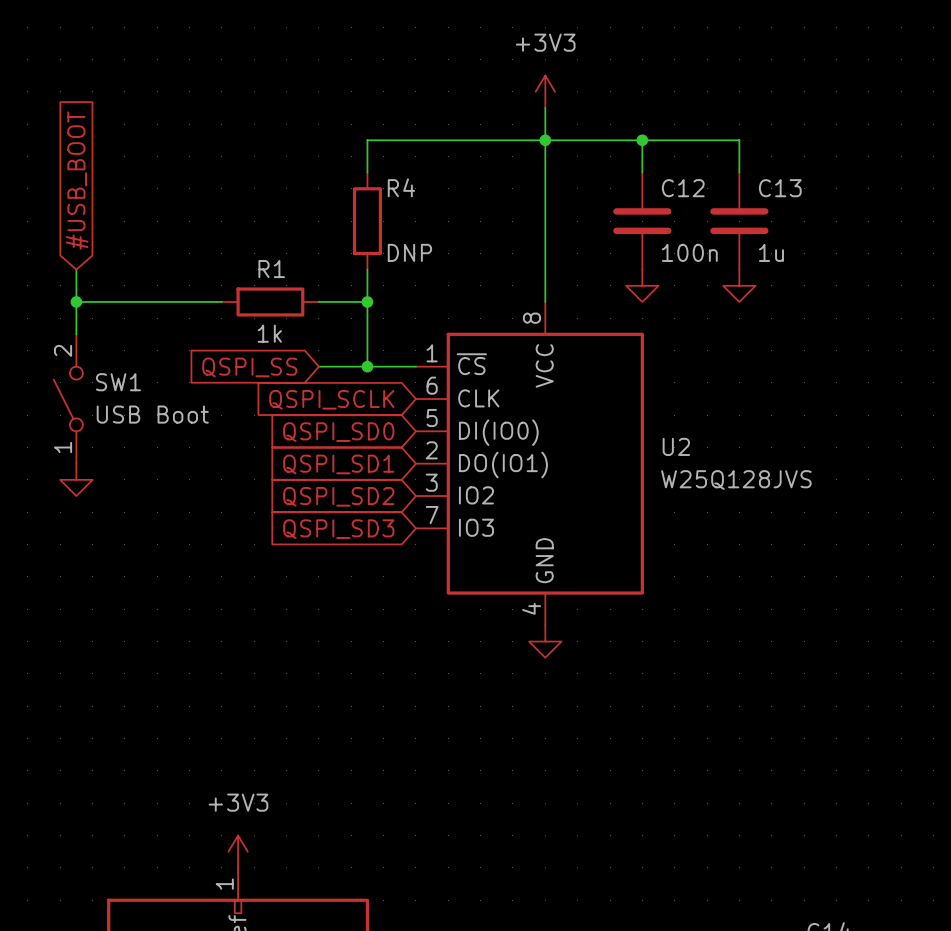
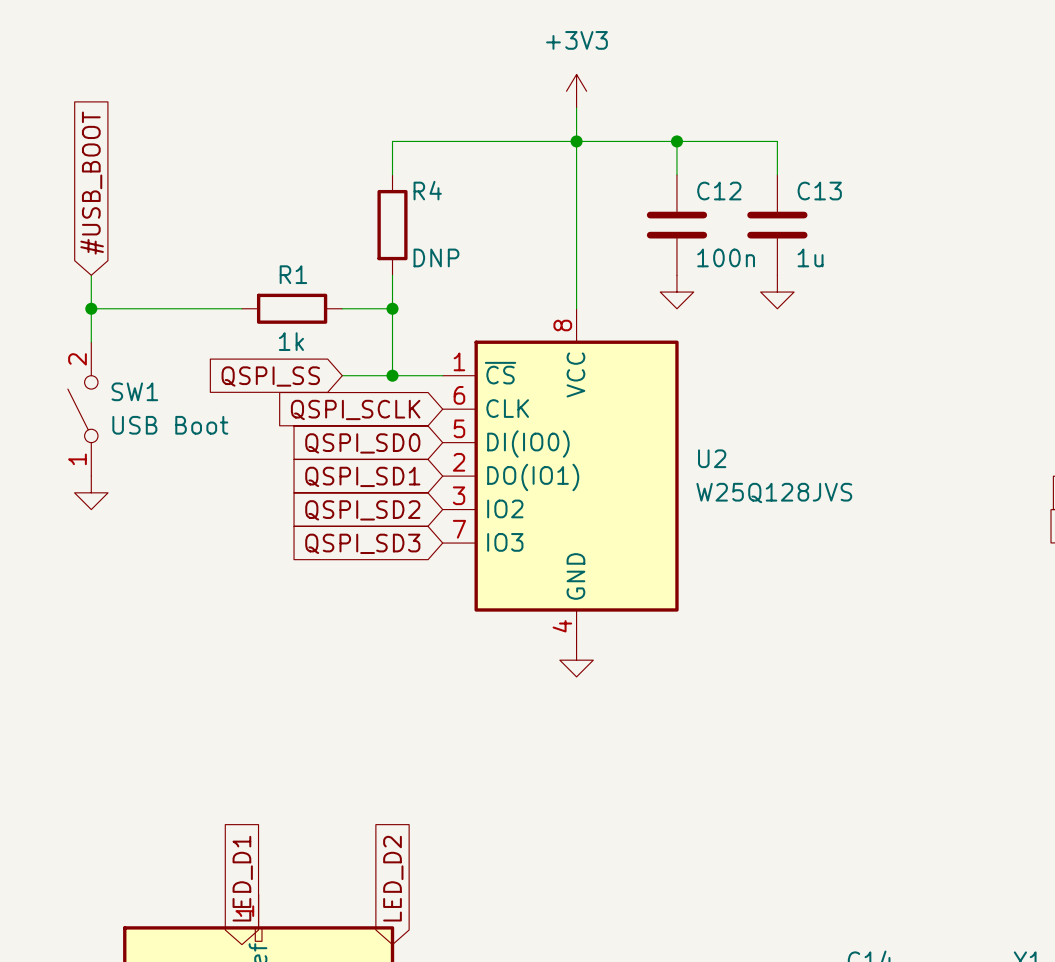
power symbol: +3V3 (238, 851) -> none
global label: none -> LED_D1 (242, 878)
global label: none -> LED_D2 (393, 878)

